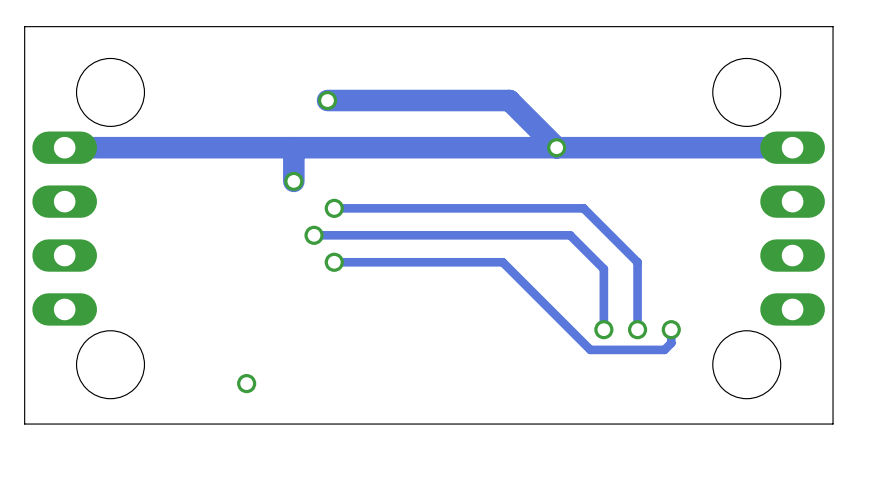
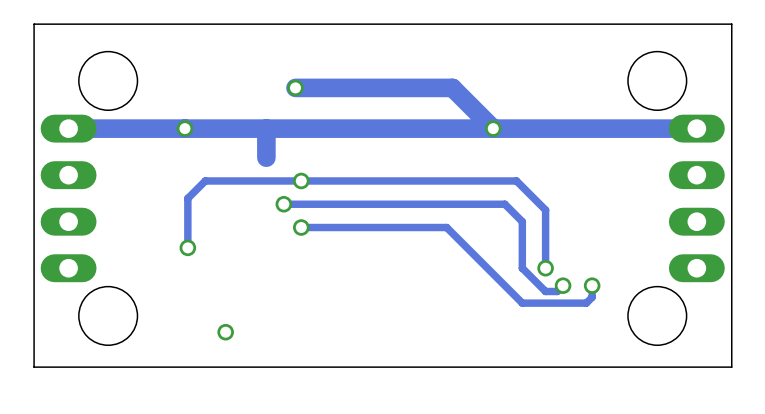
via: none -> (184, 128)
via: (293, 181) -> none
track: none -> (301, 180) (205, 180) (187, 198) (187, 247)
track: (617, 242) (637, 262) (637, 329) -> (545, 210) (545, 268)
track: (590, 255) (603, 269) (603, 329) -> (522, 221) (522, 268) (545, 291) (557, 291) (563, 285)
via: none -> (187, 247)
via position: (603, 329) -> (545, 268)

